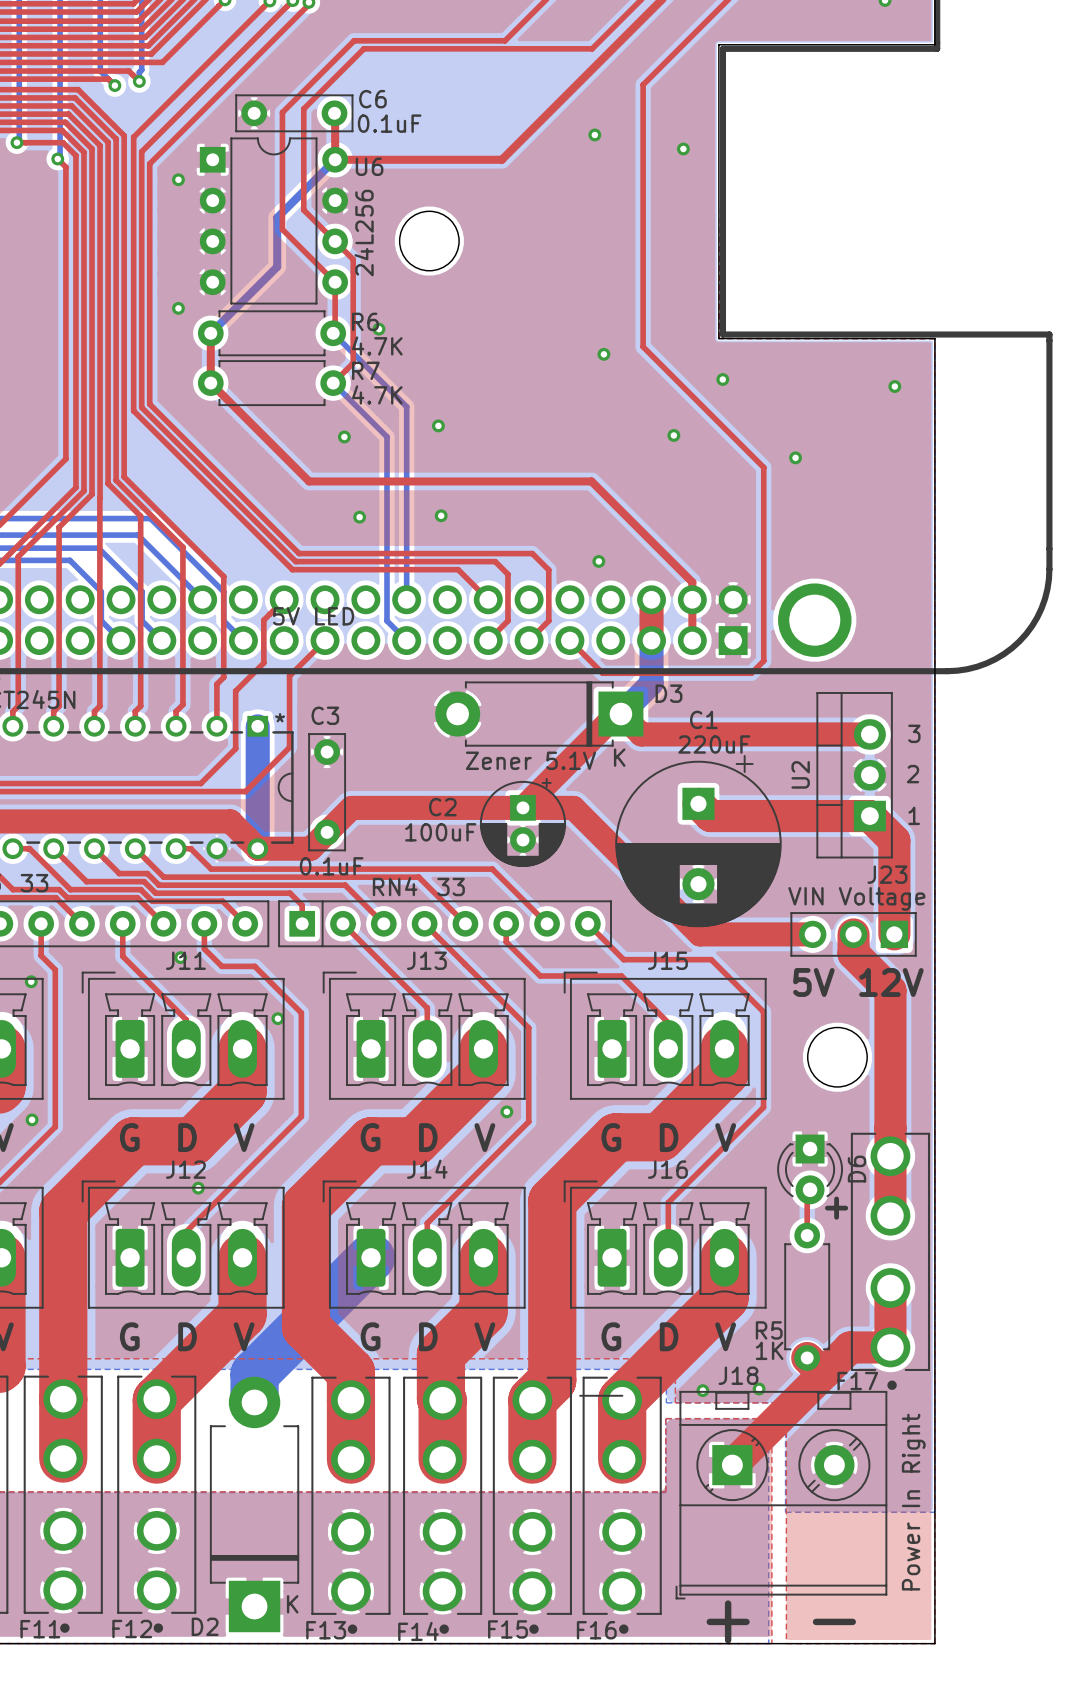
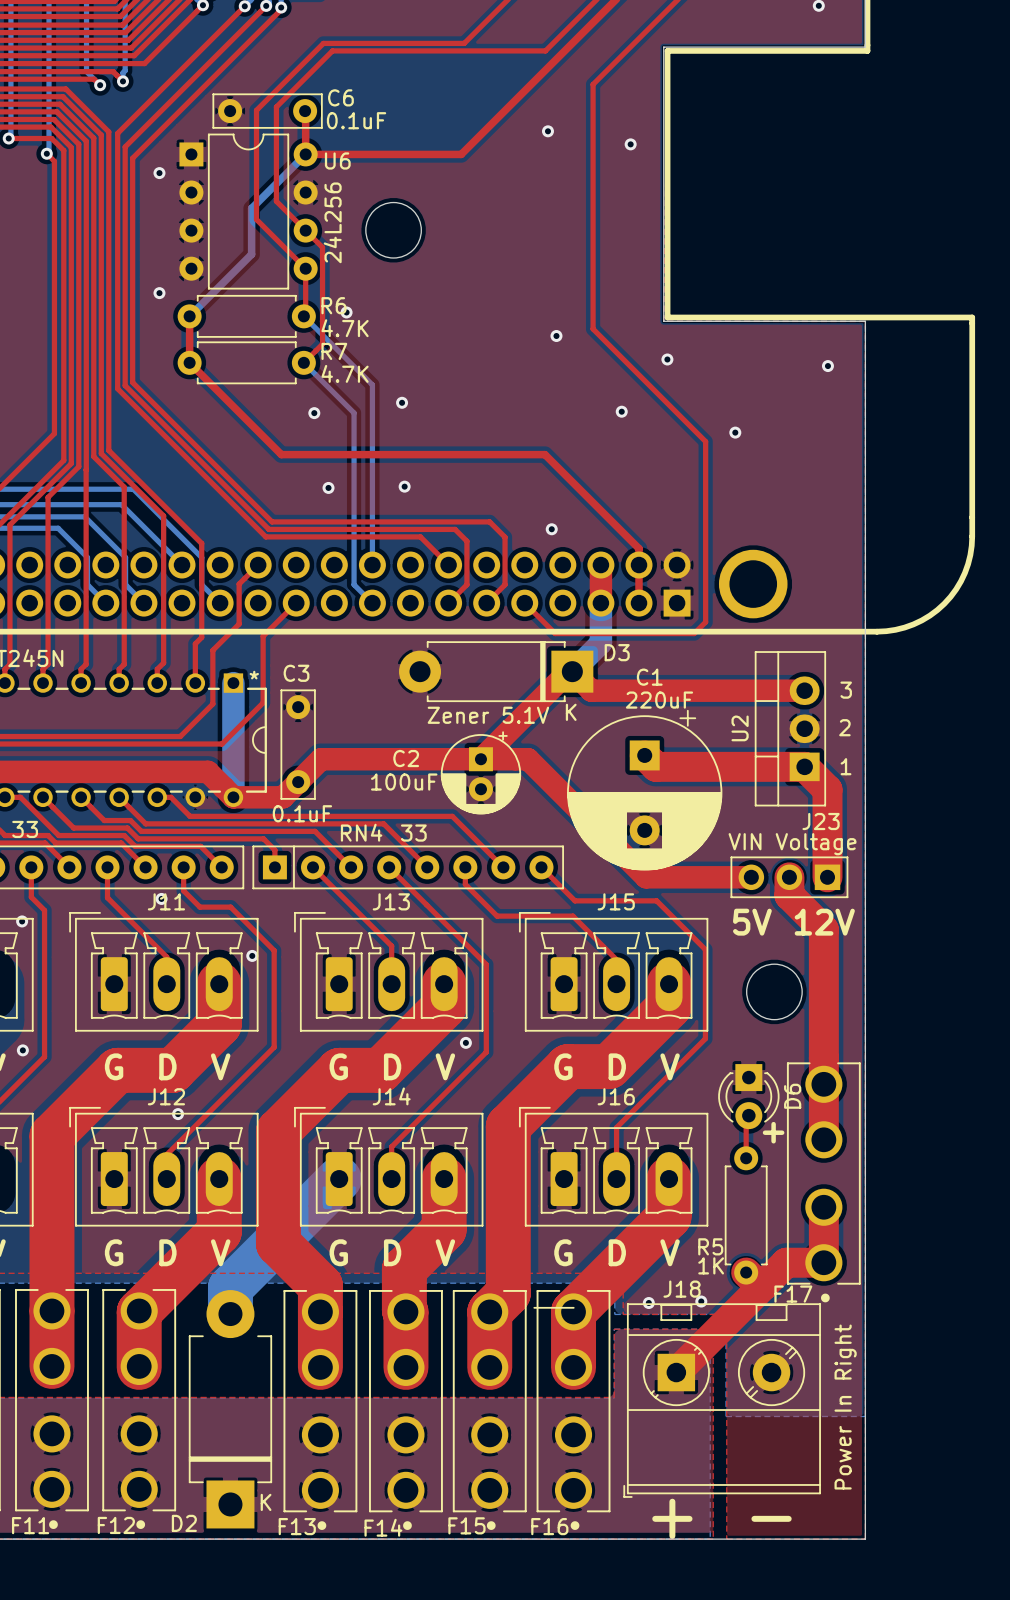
drawing: [272, 607, 355, 626] -> none

